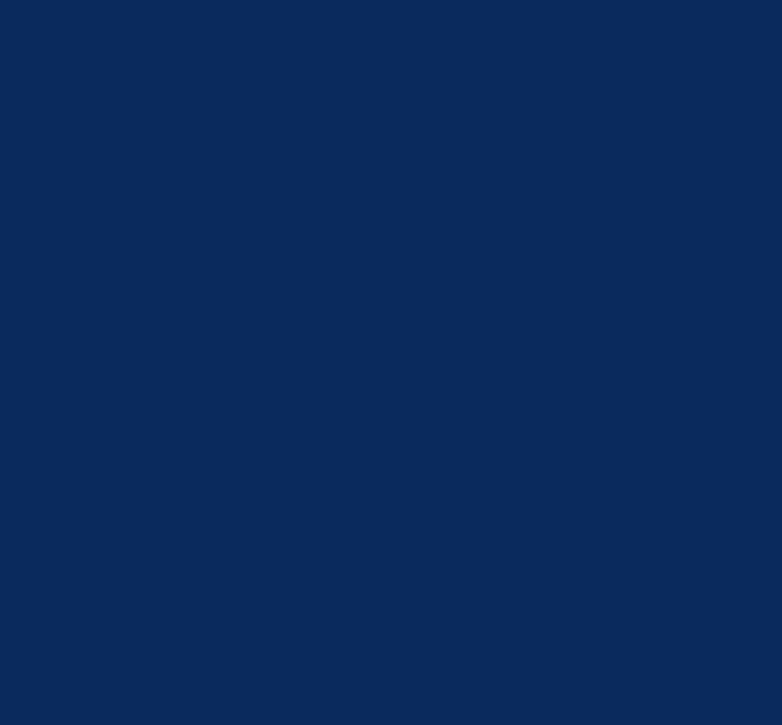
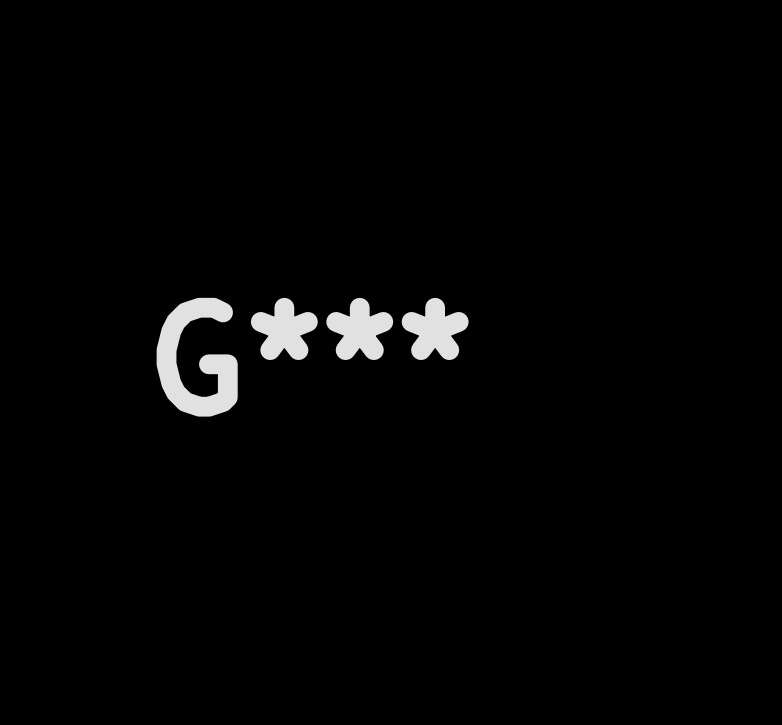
G***: none -> (312, 357)

